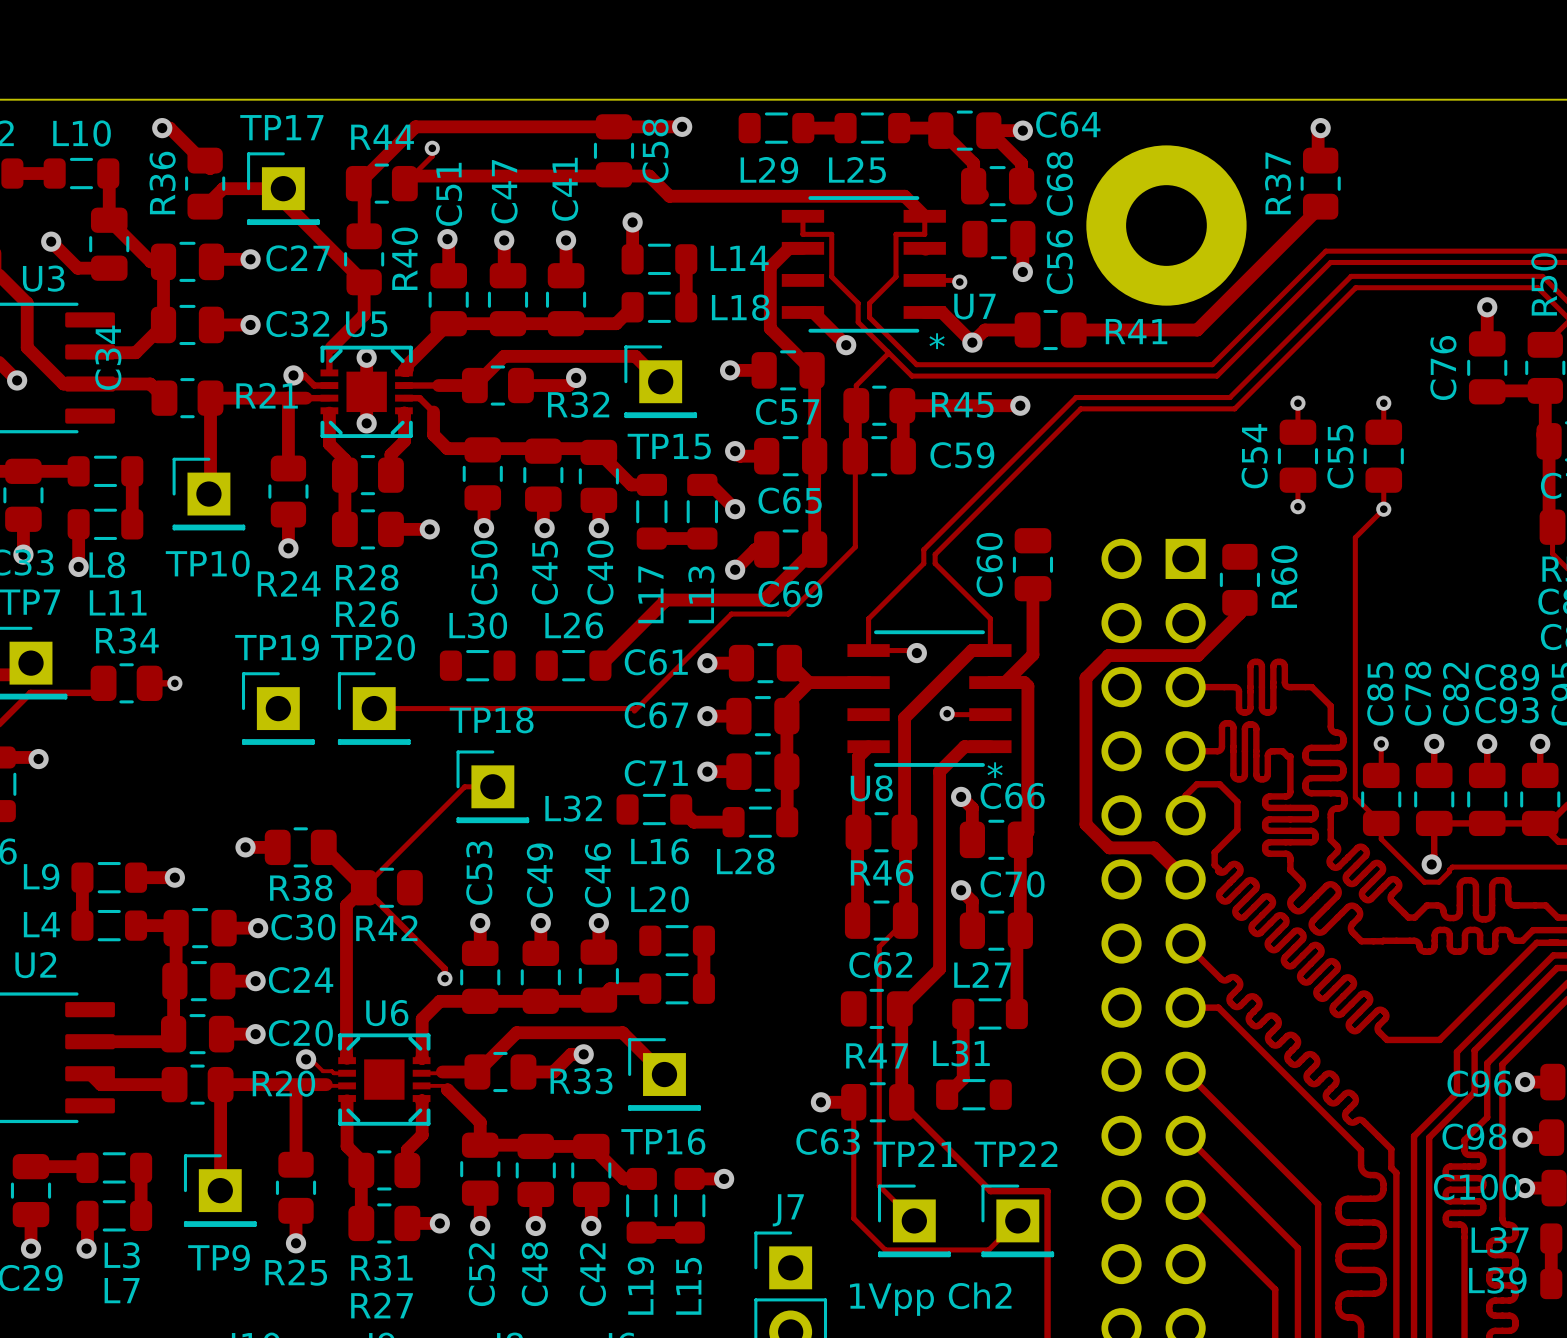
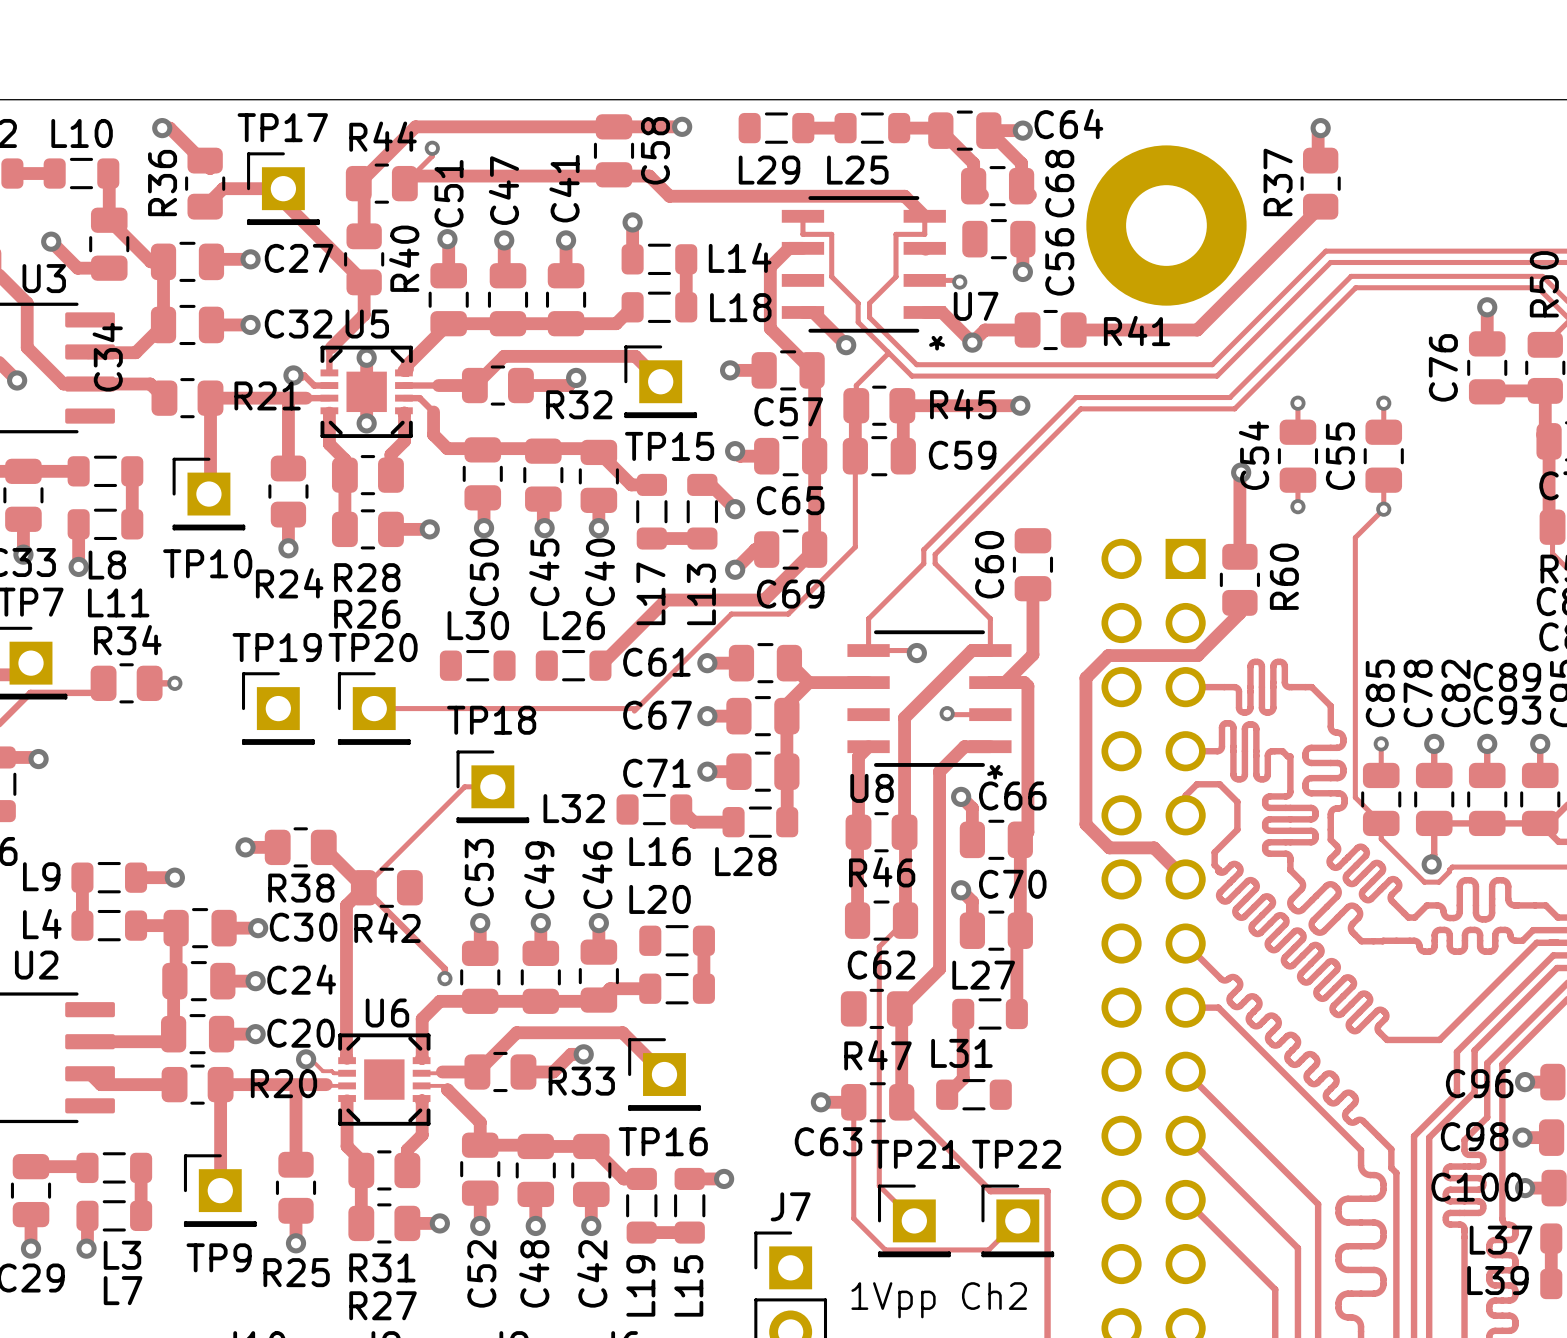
track: none -> (1241, 472) (1239, 556)
via: none -> (1241, 472)

